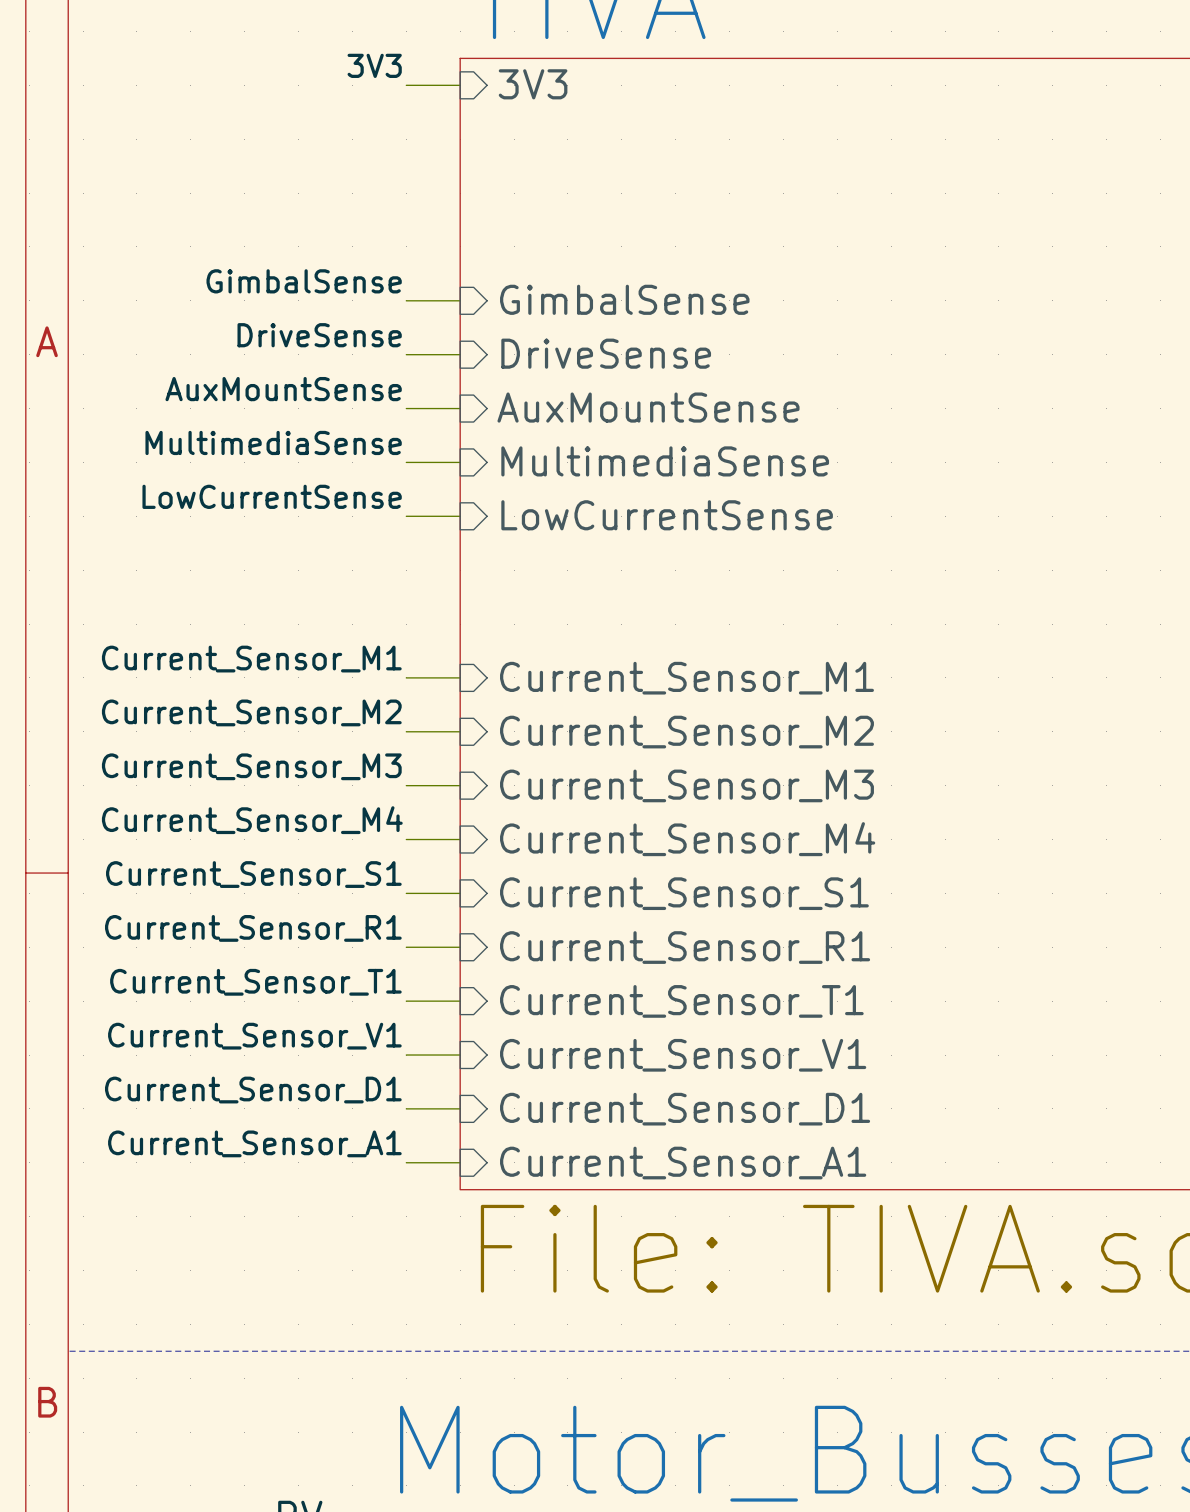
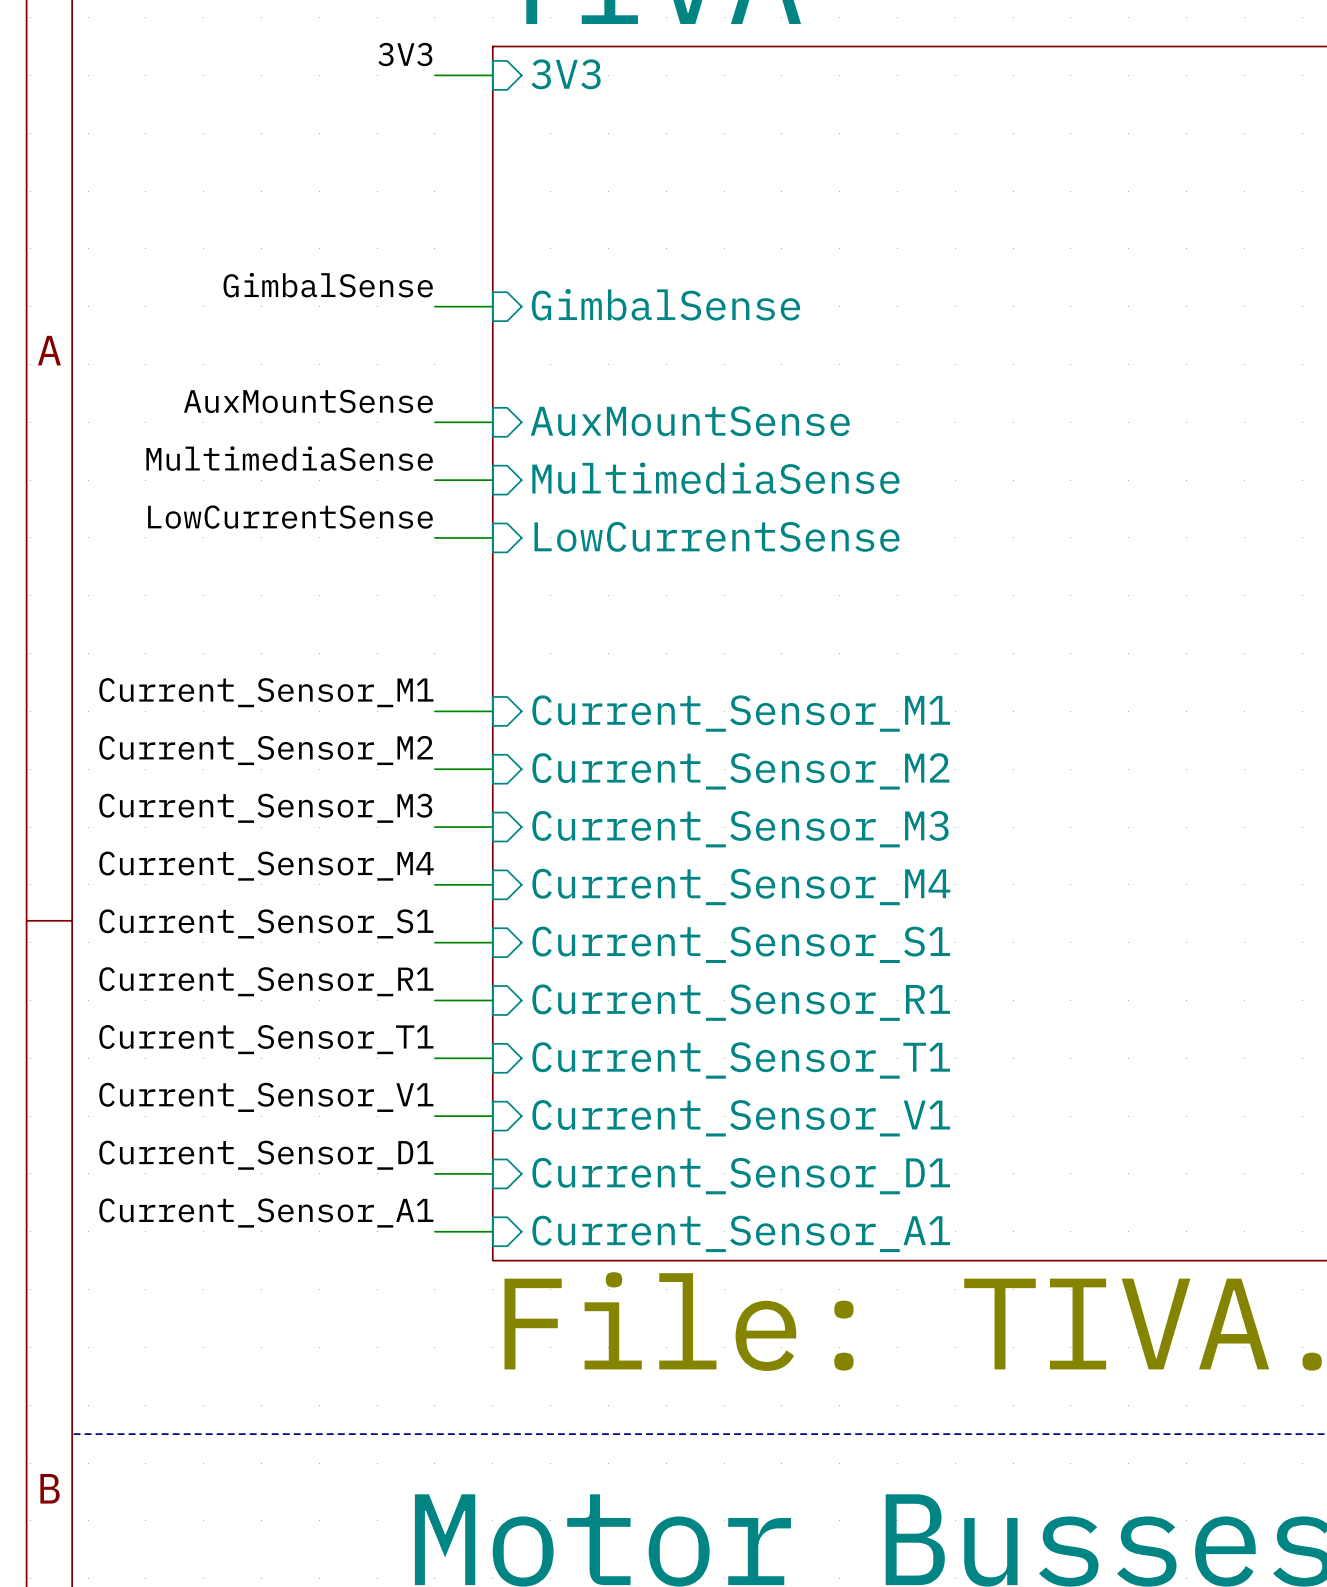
label: DriveSense (319, 335) -> none
sheet pin: DriveSense (606, 353) -> none
wire: (406, 354) (460, 354) -> none

